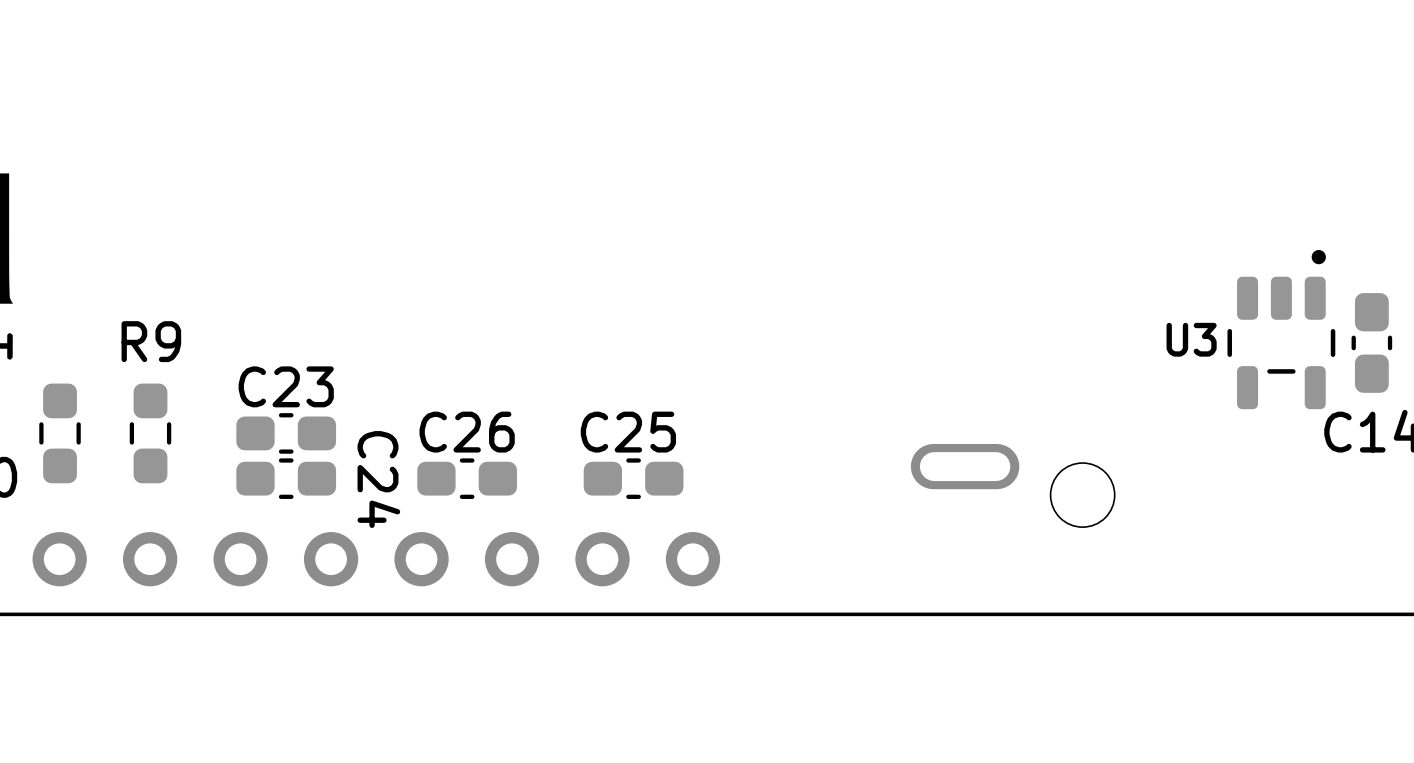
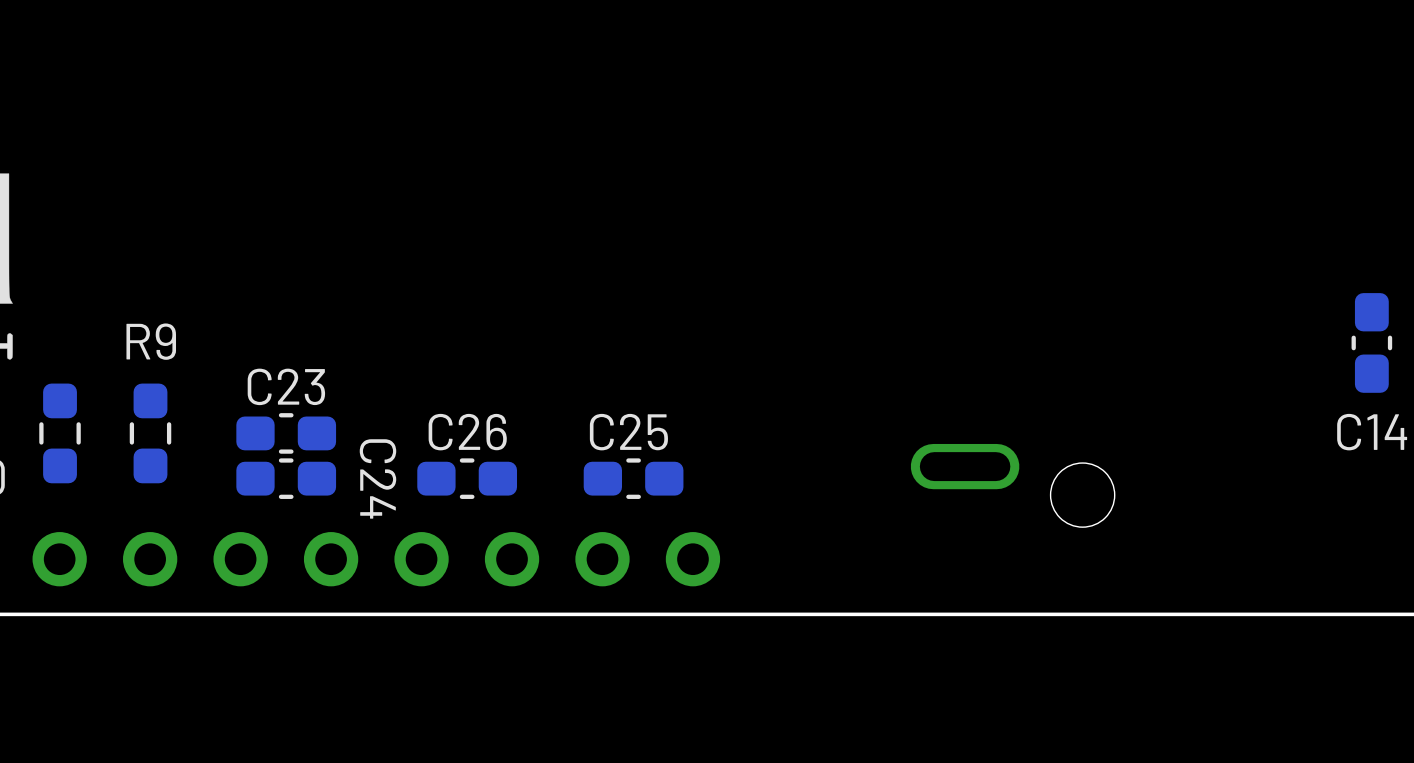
U3: (1281, 329) -> none

